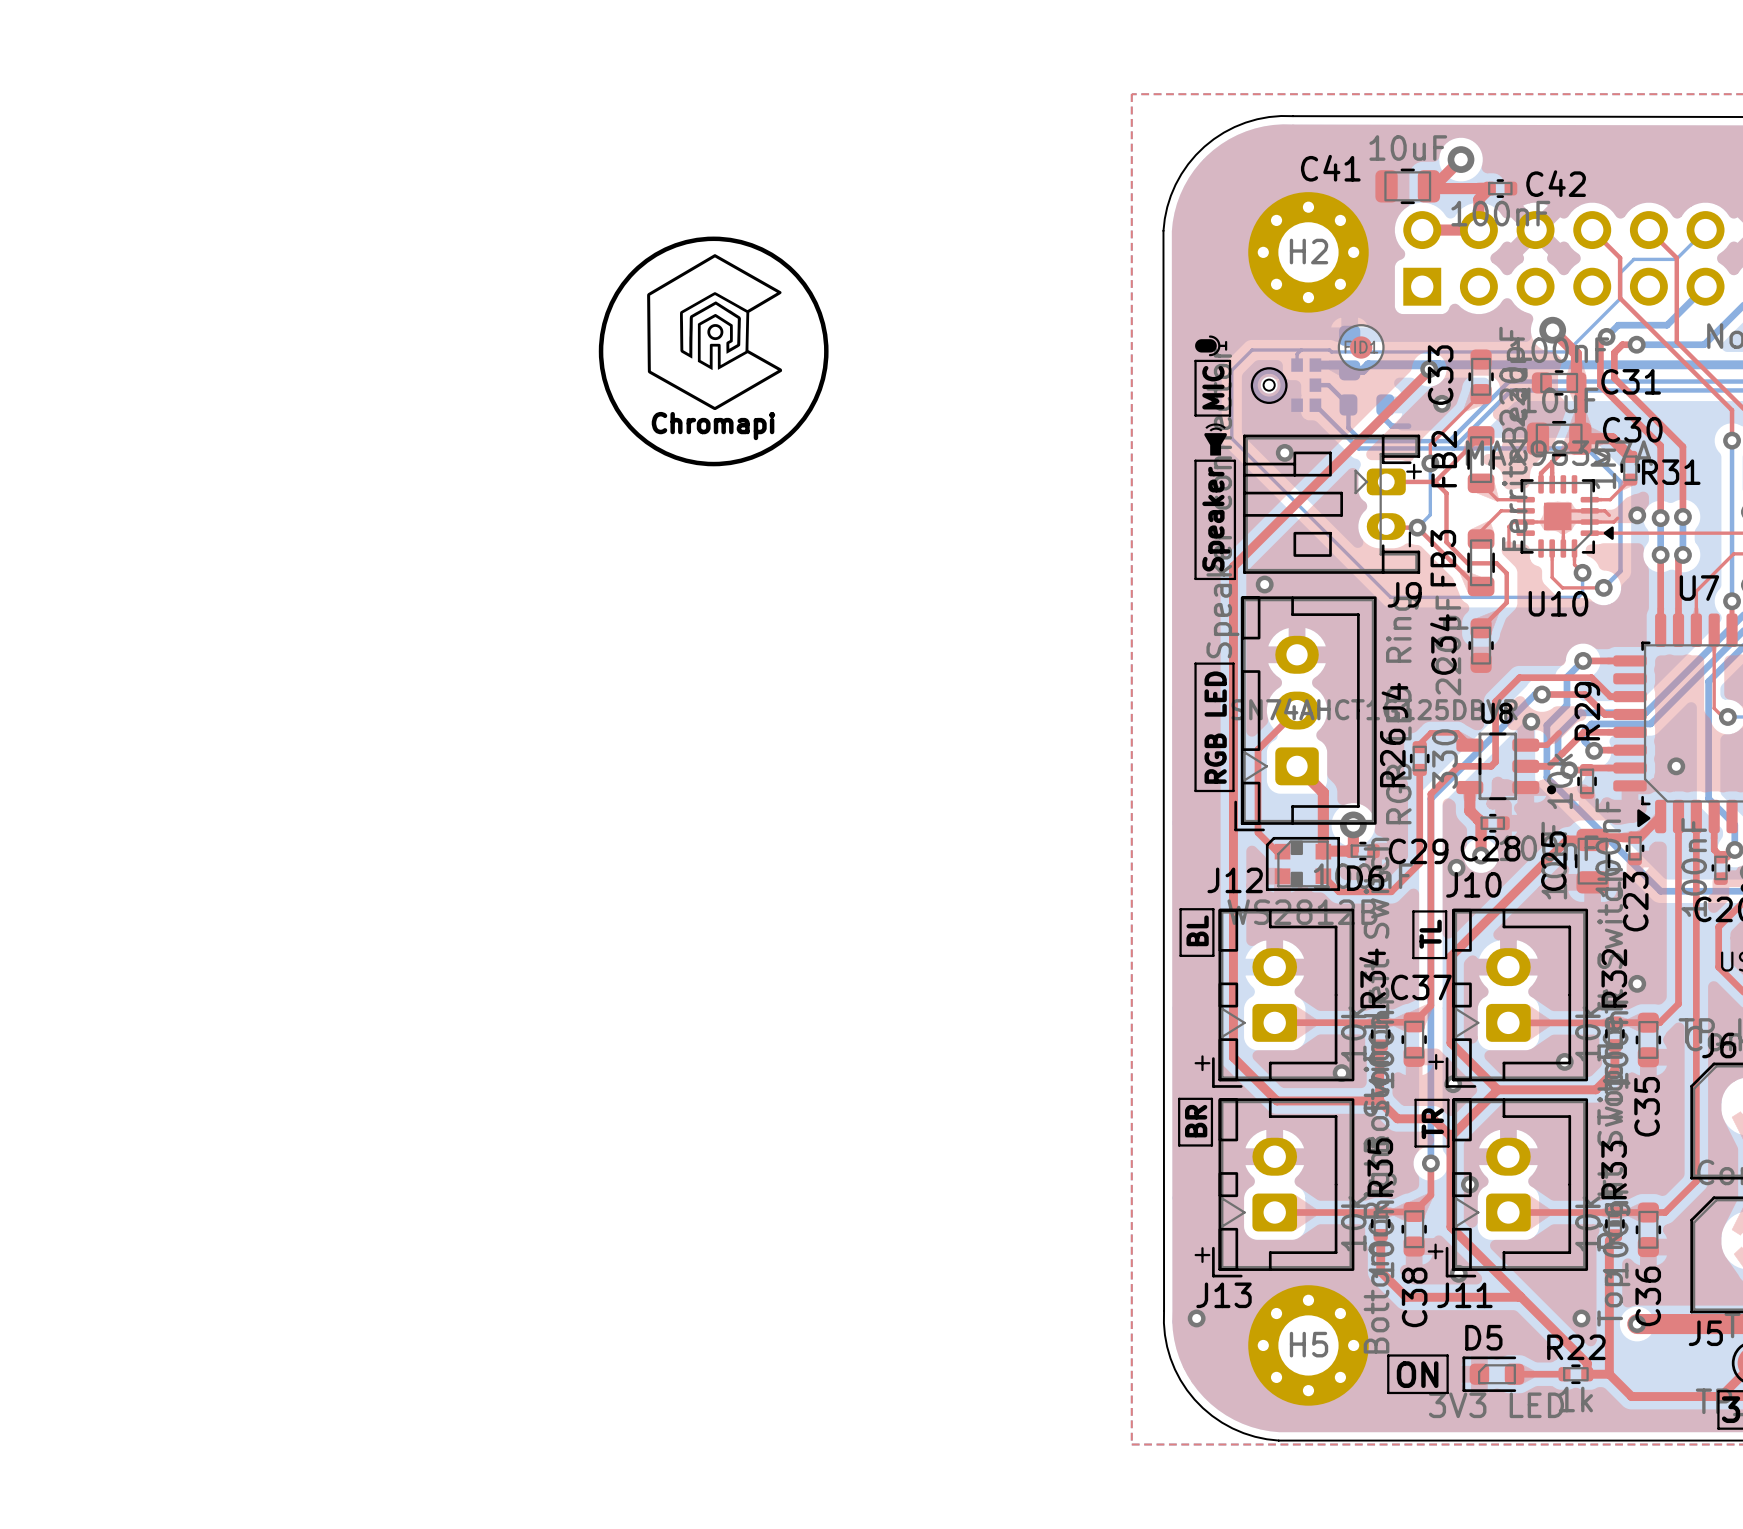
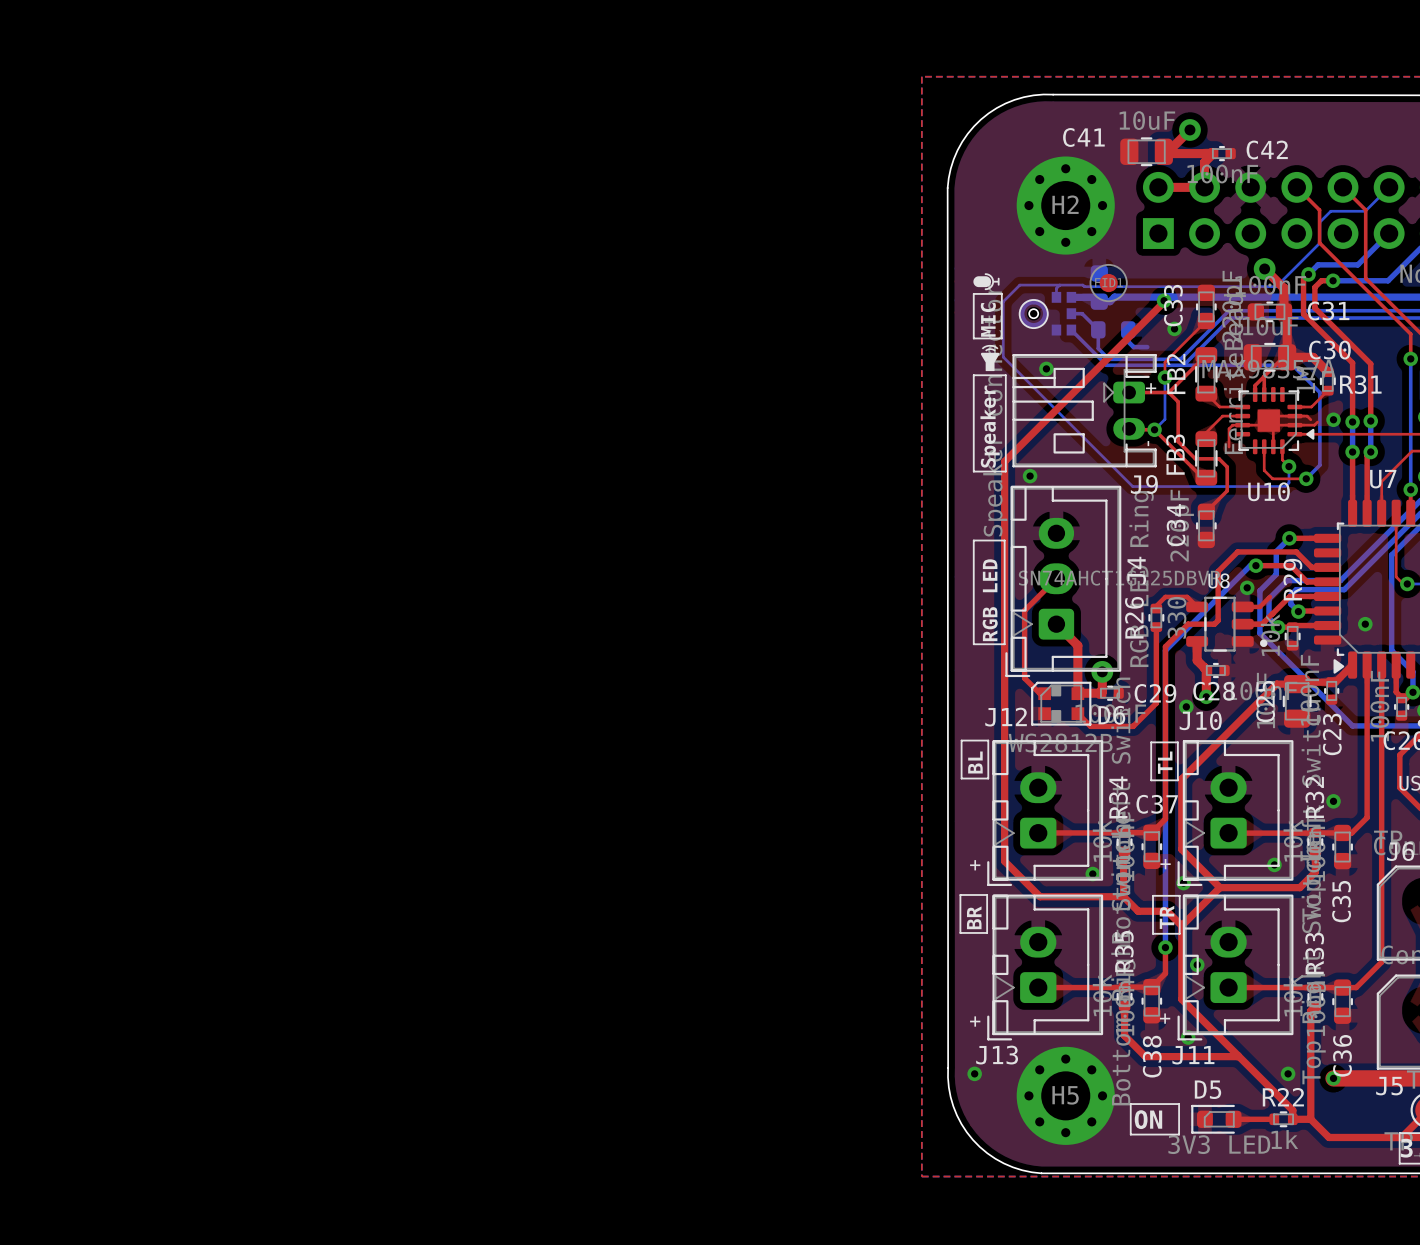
drawing: [598, 236, 829, 467] -> none
text: Chromapi (713, 426) -> none

